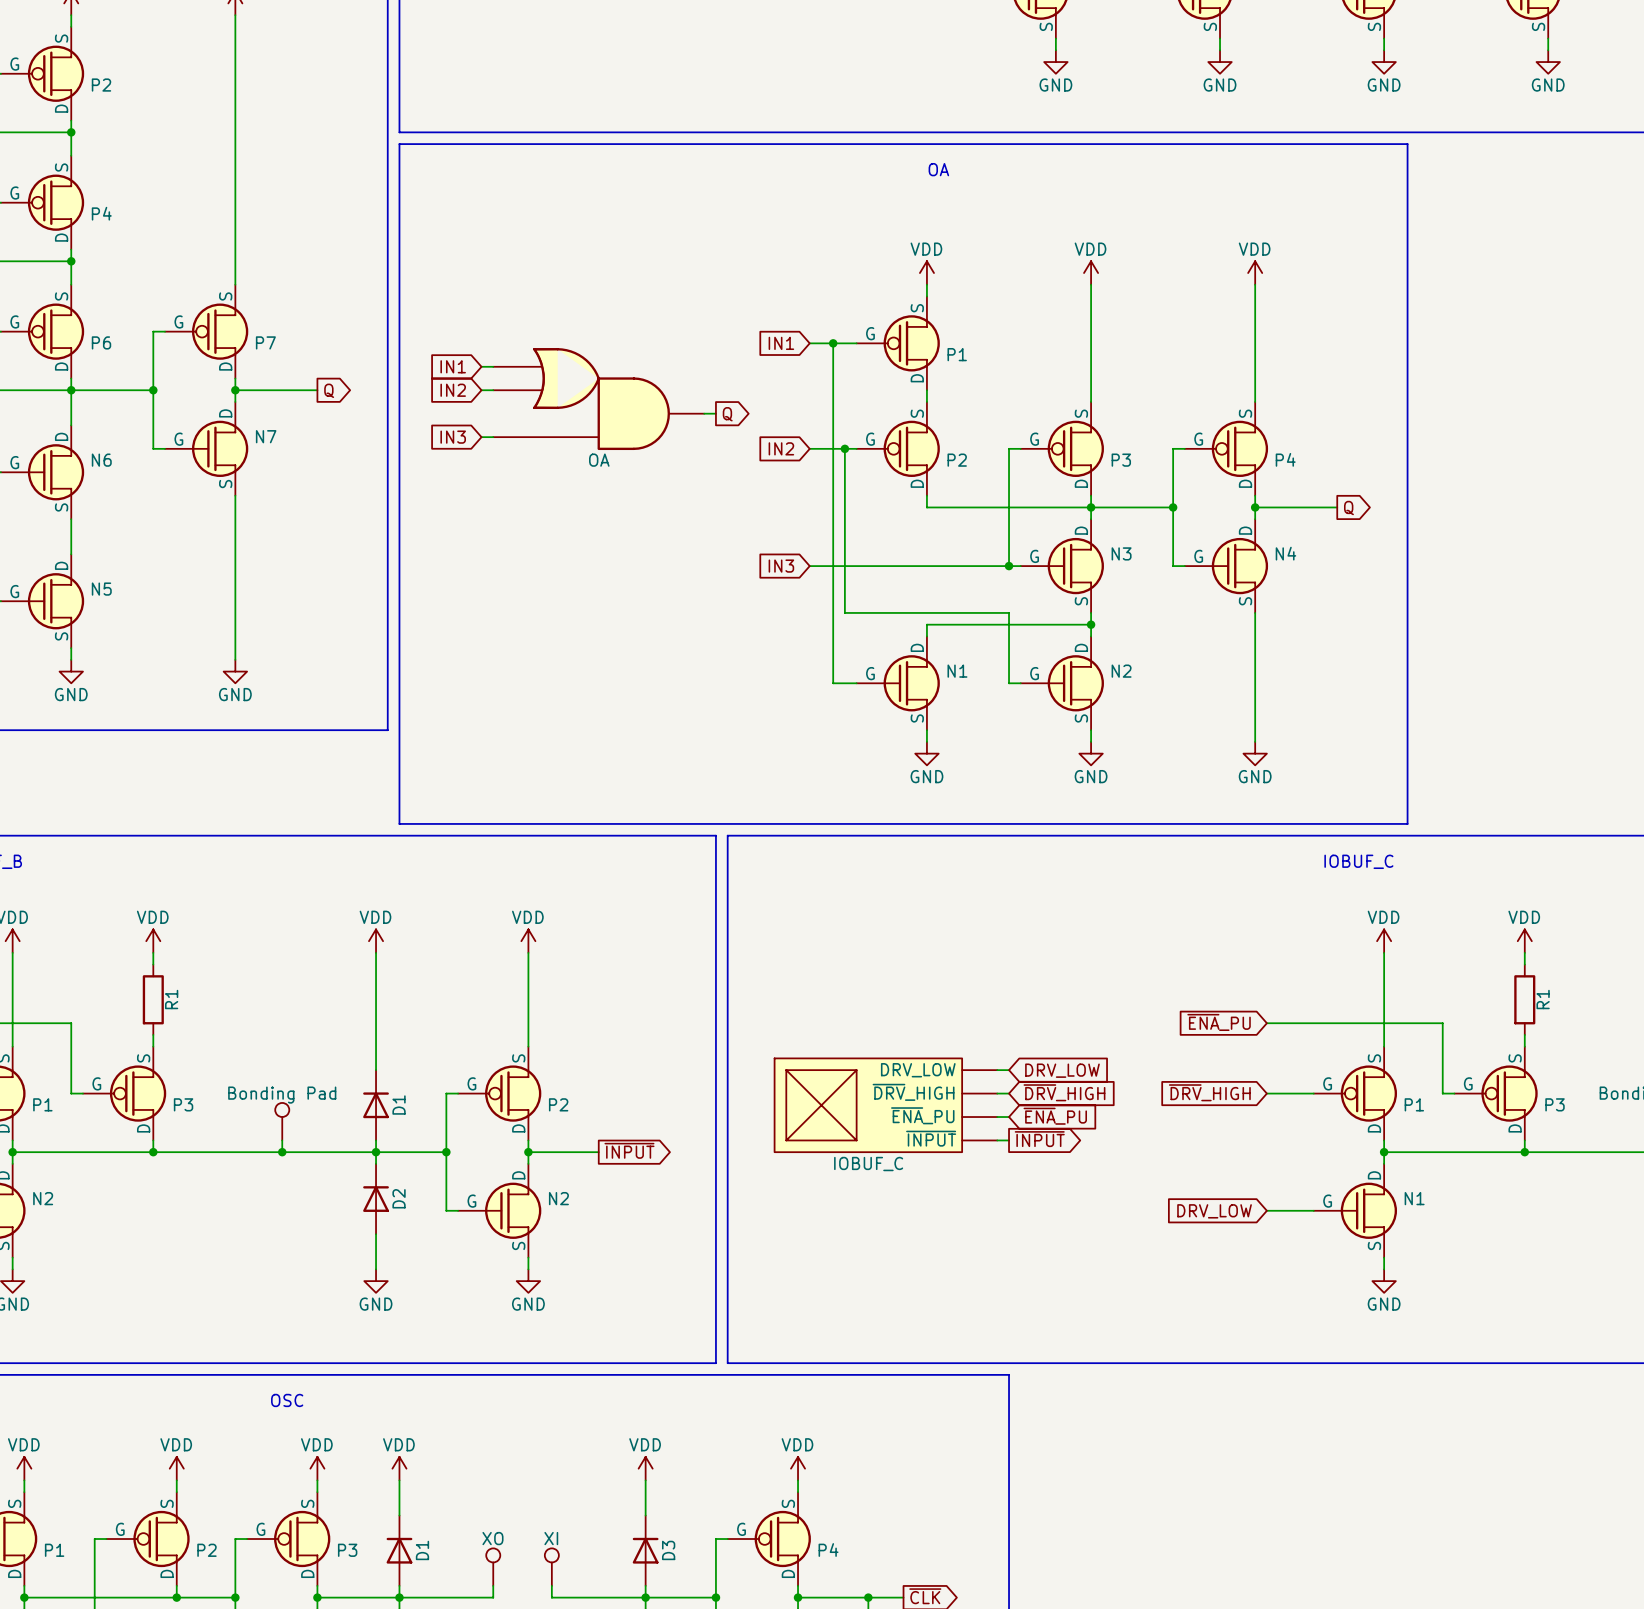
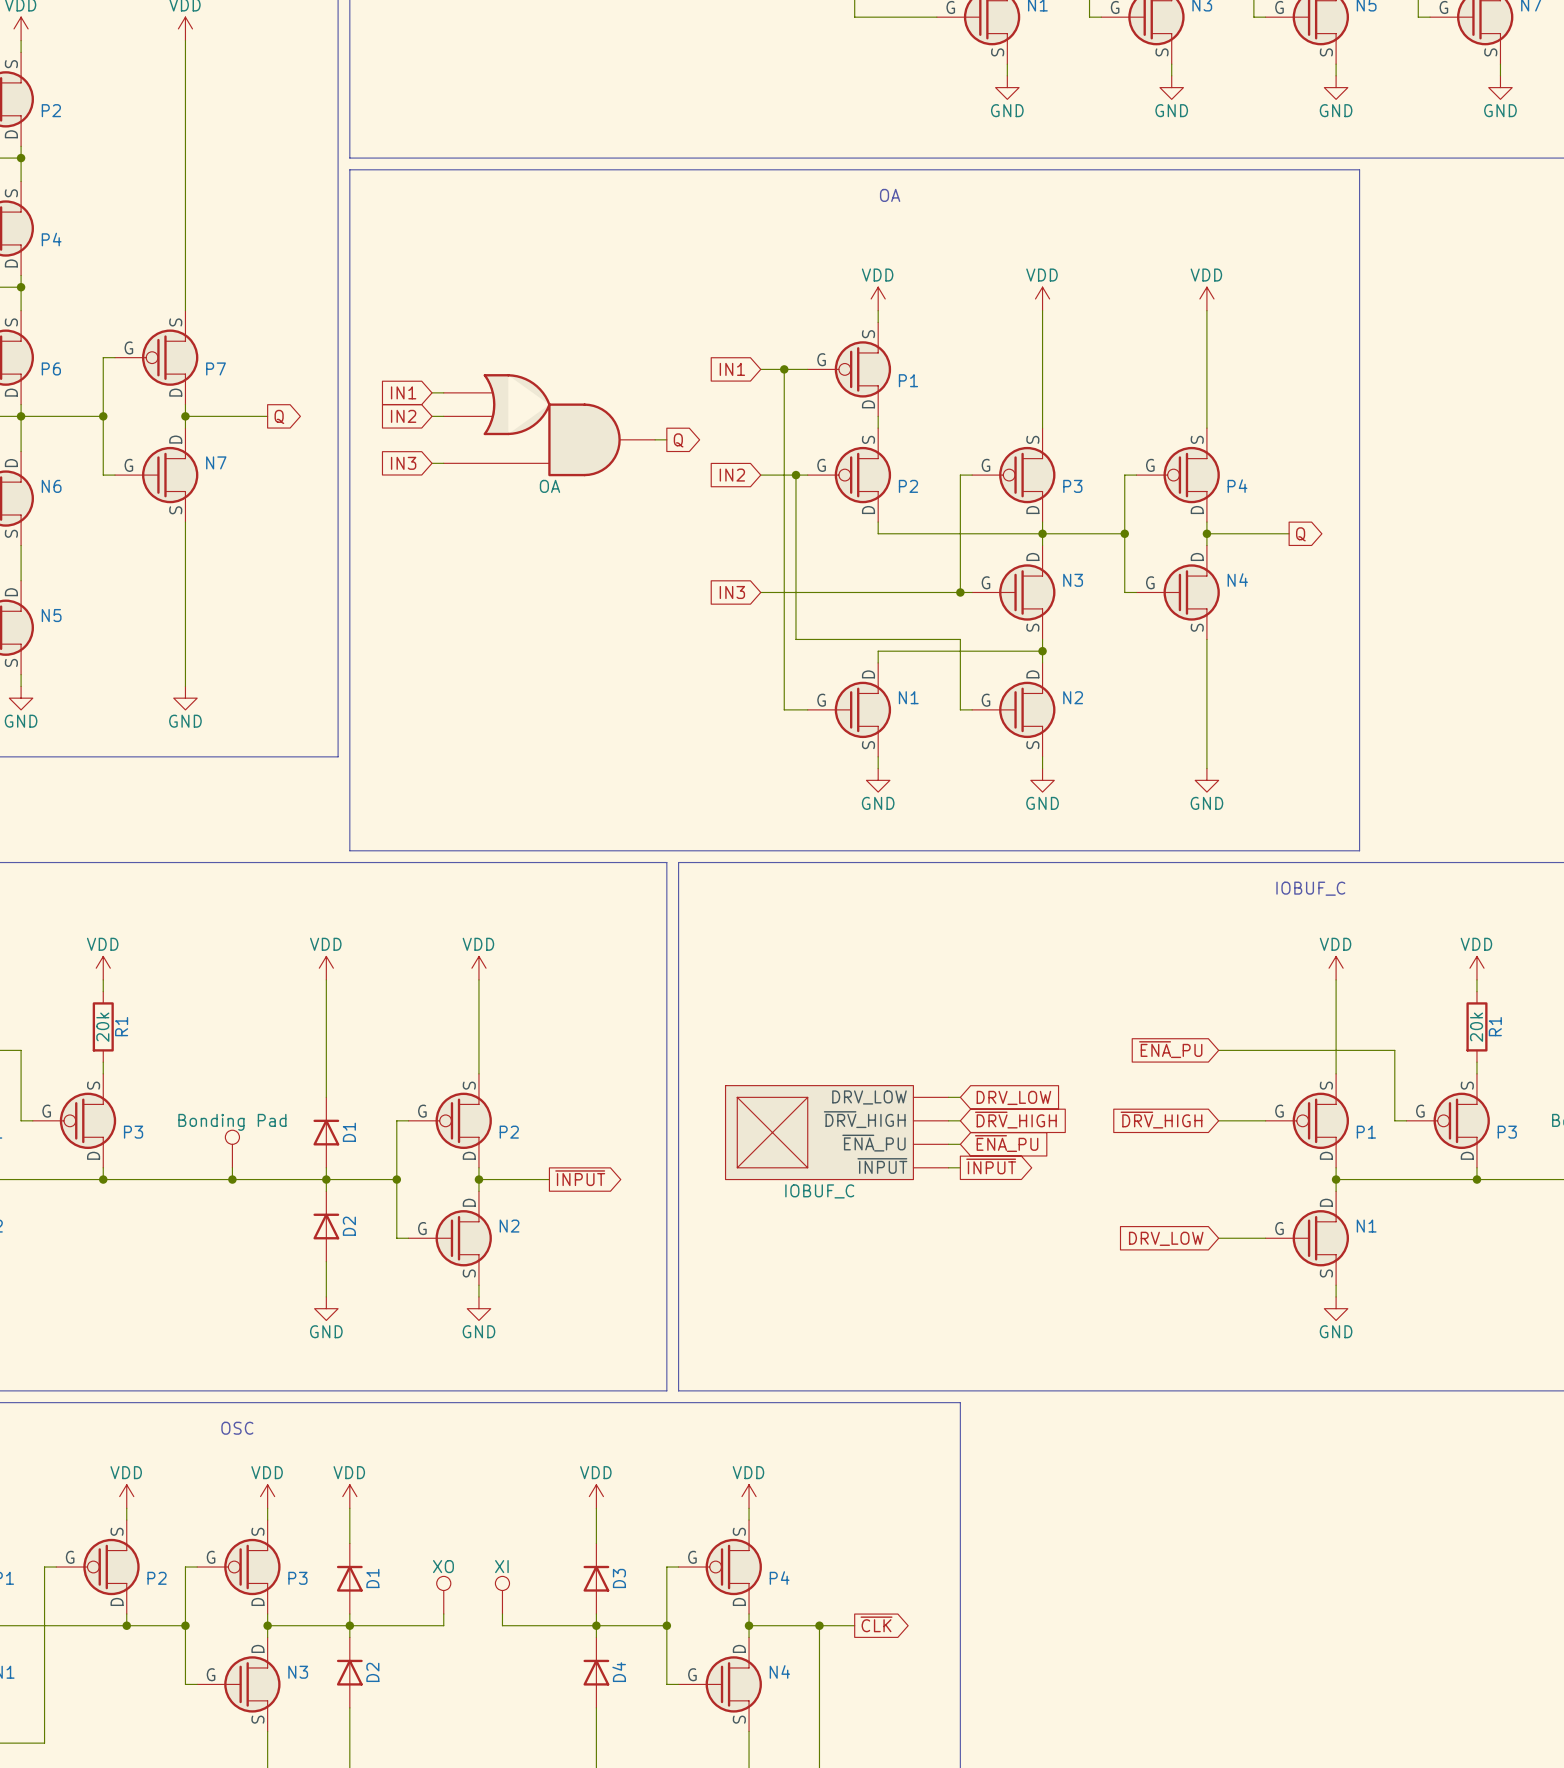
R1 value: none -> 20k (102, 1027)
R1 value: none -> 20k (1476, 1027)

